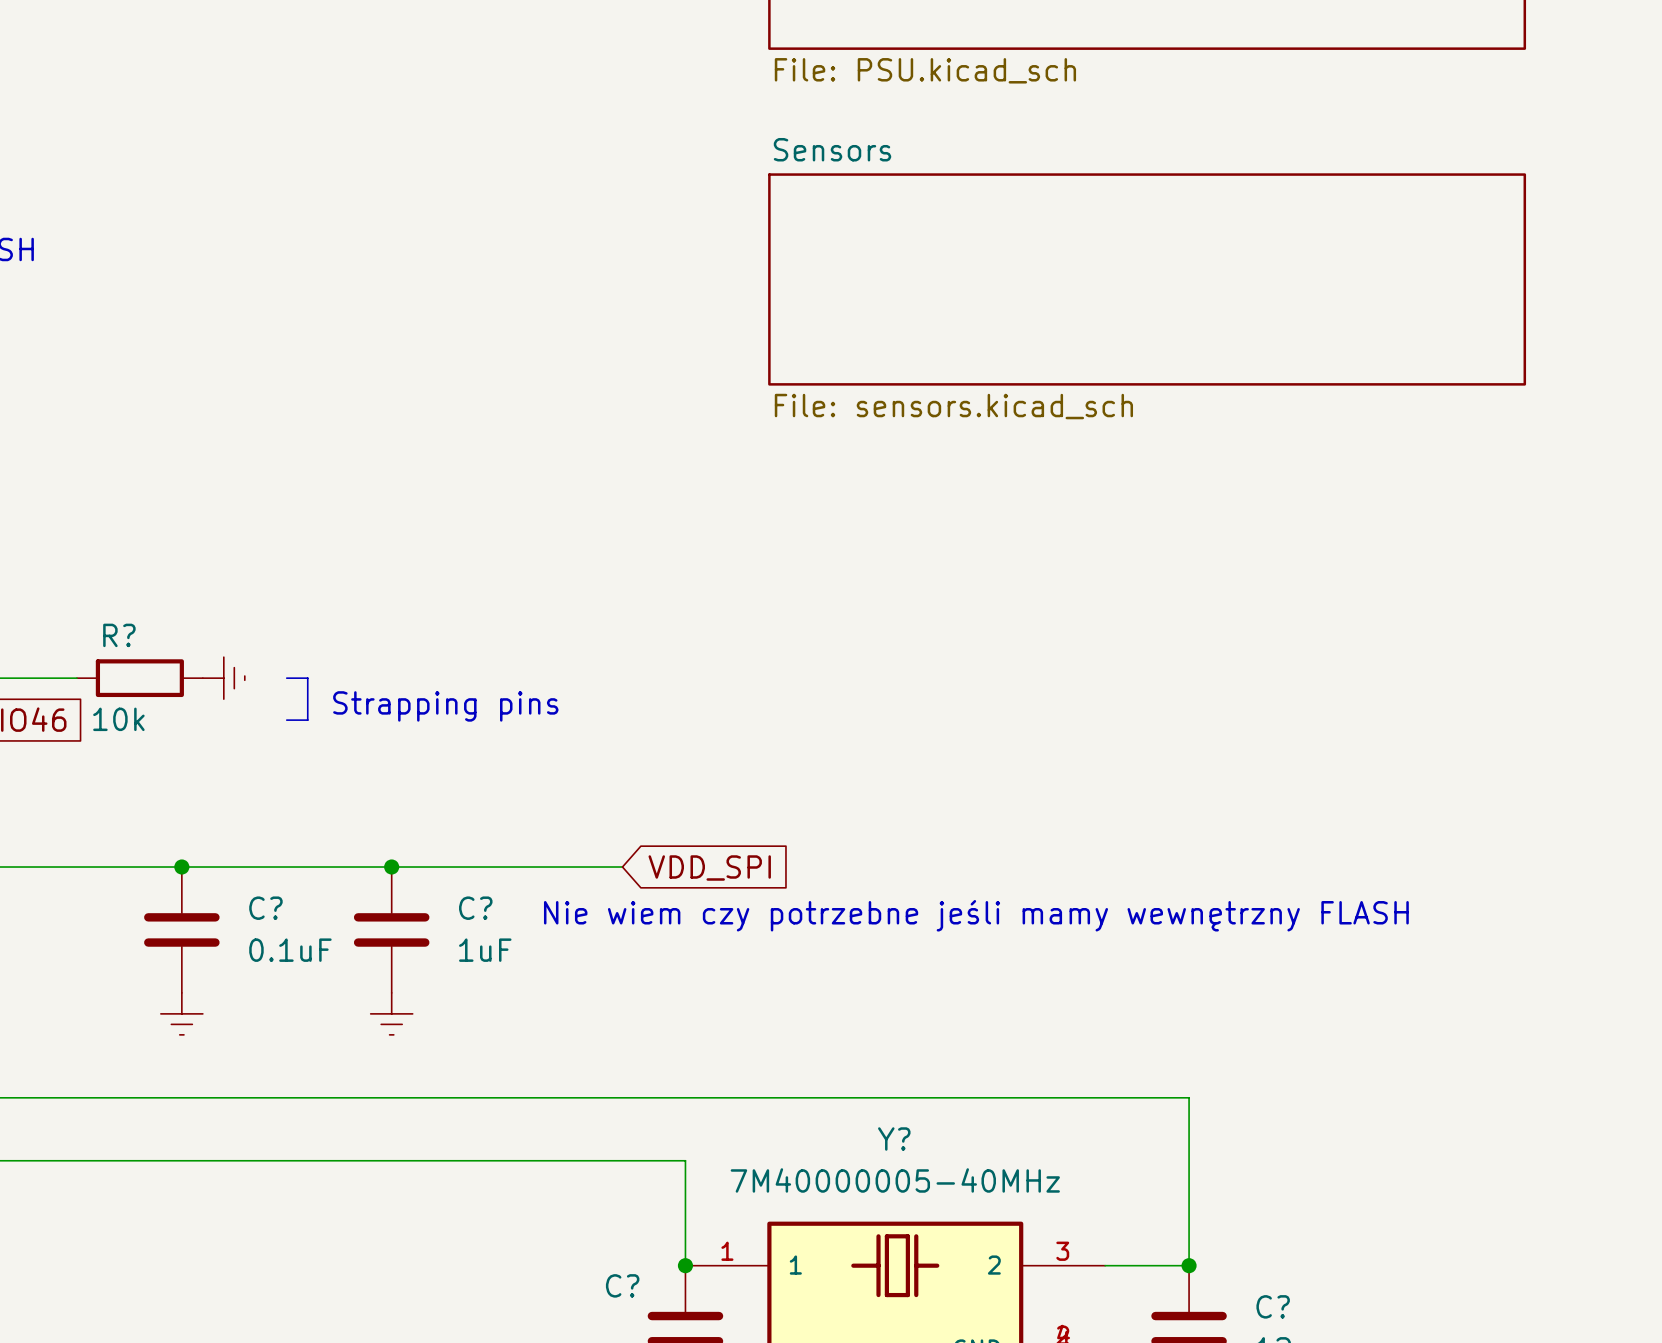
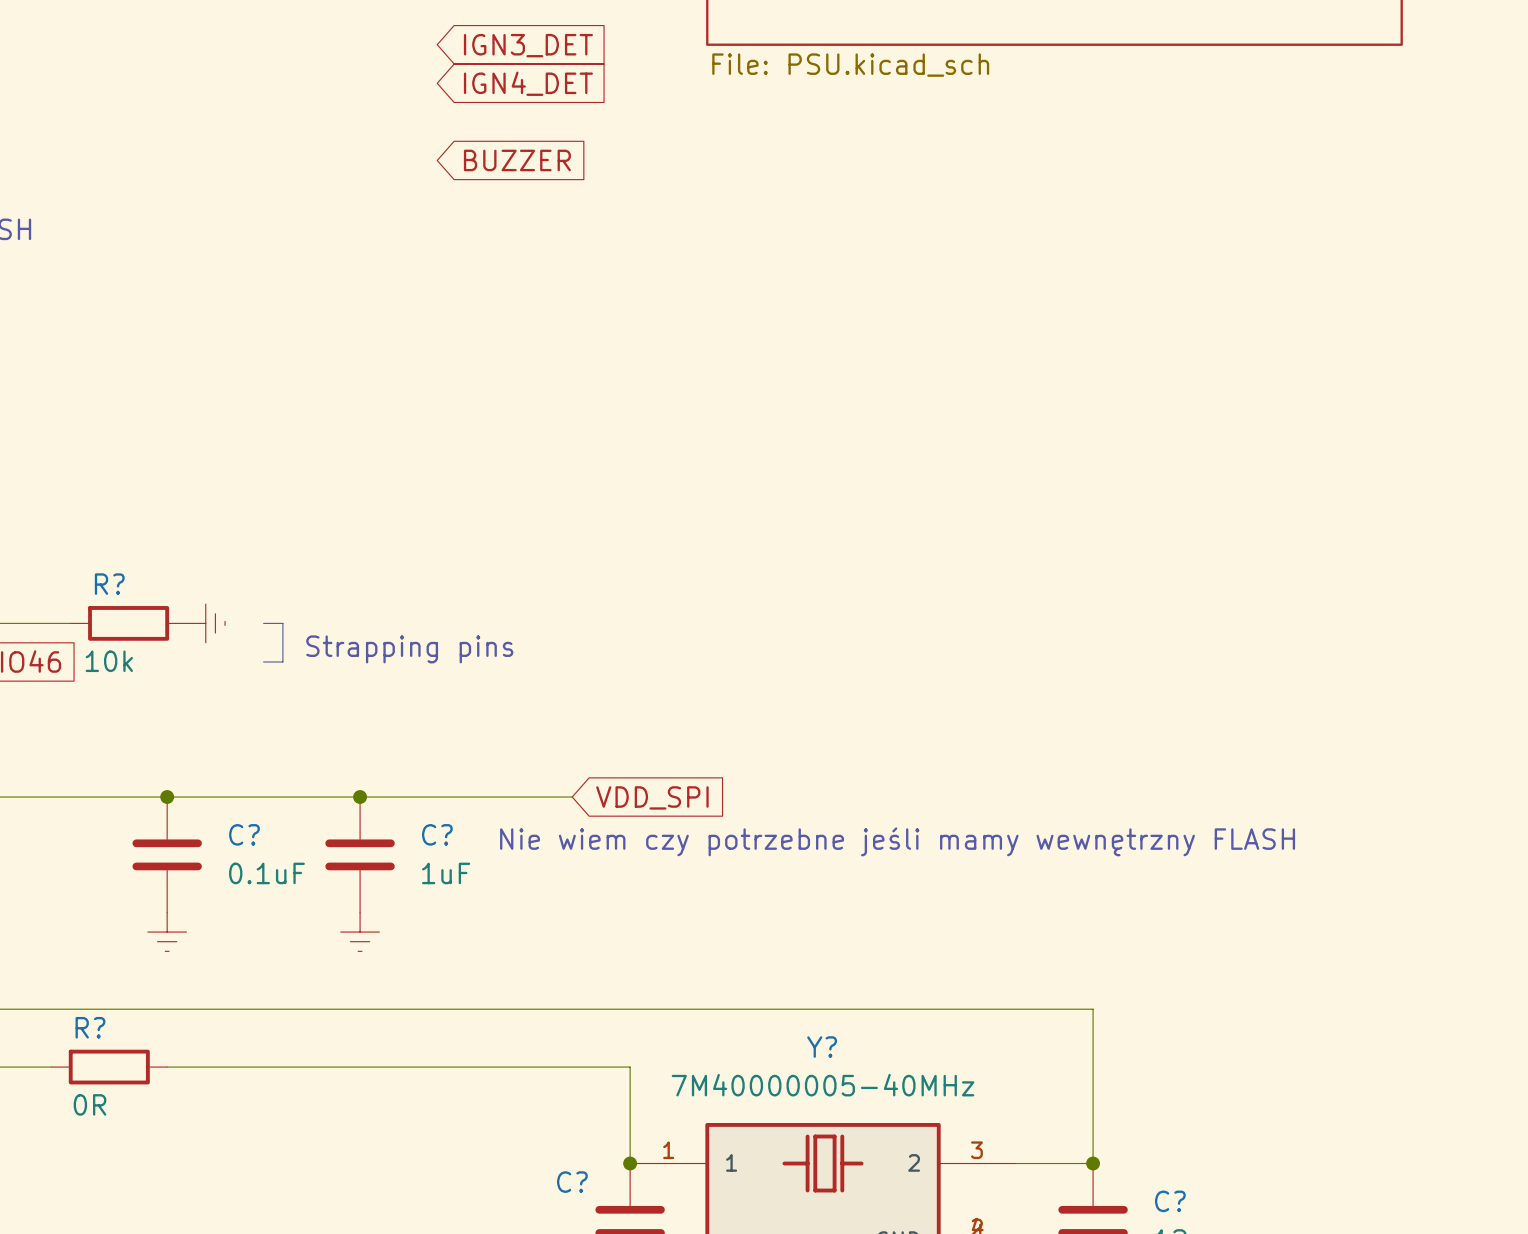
global label: none -> IGN3_DET (528, 45)
global label: none -> IGN4_DET (528, 83)
global label: none -> BUZZER (517, 160)
sheet Sensors: File: sensors.kicad_sch (1147, 279) -> none
wire: (55, 1160) (181, 1160) -> none
R?: none -> 0R (109, 1067)

